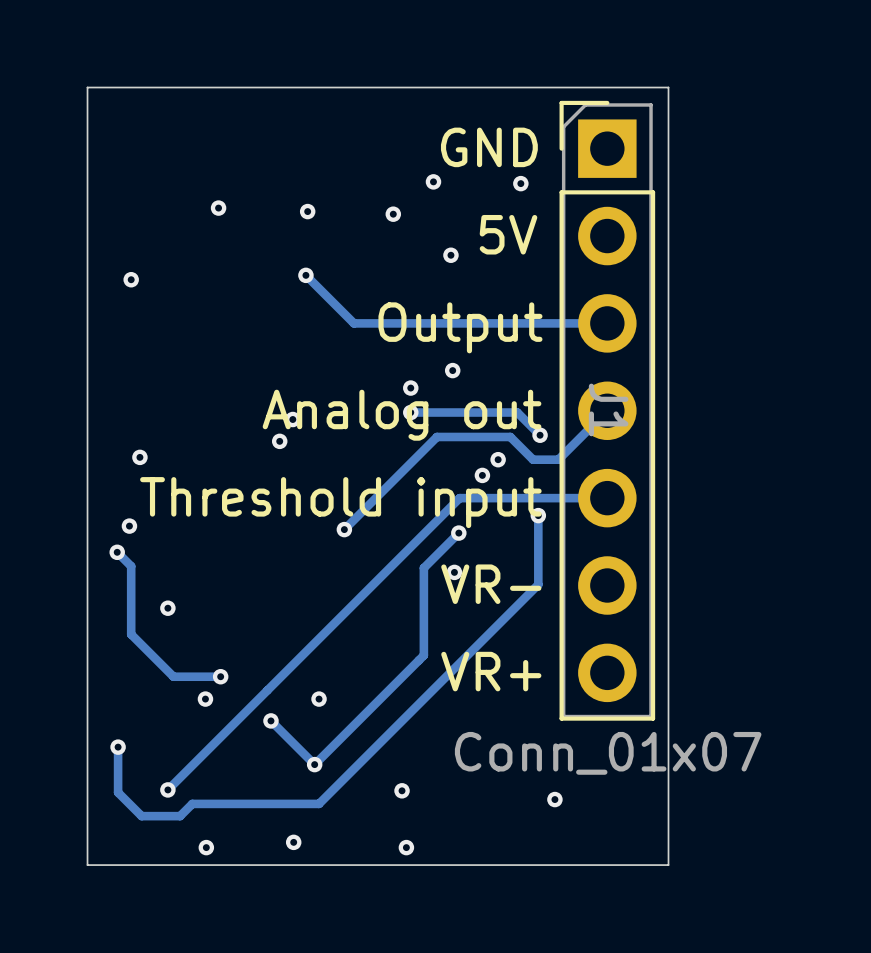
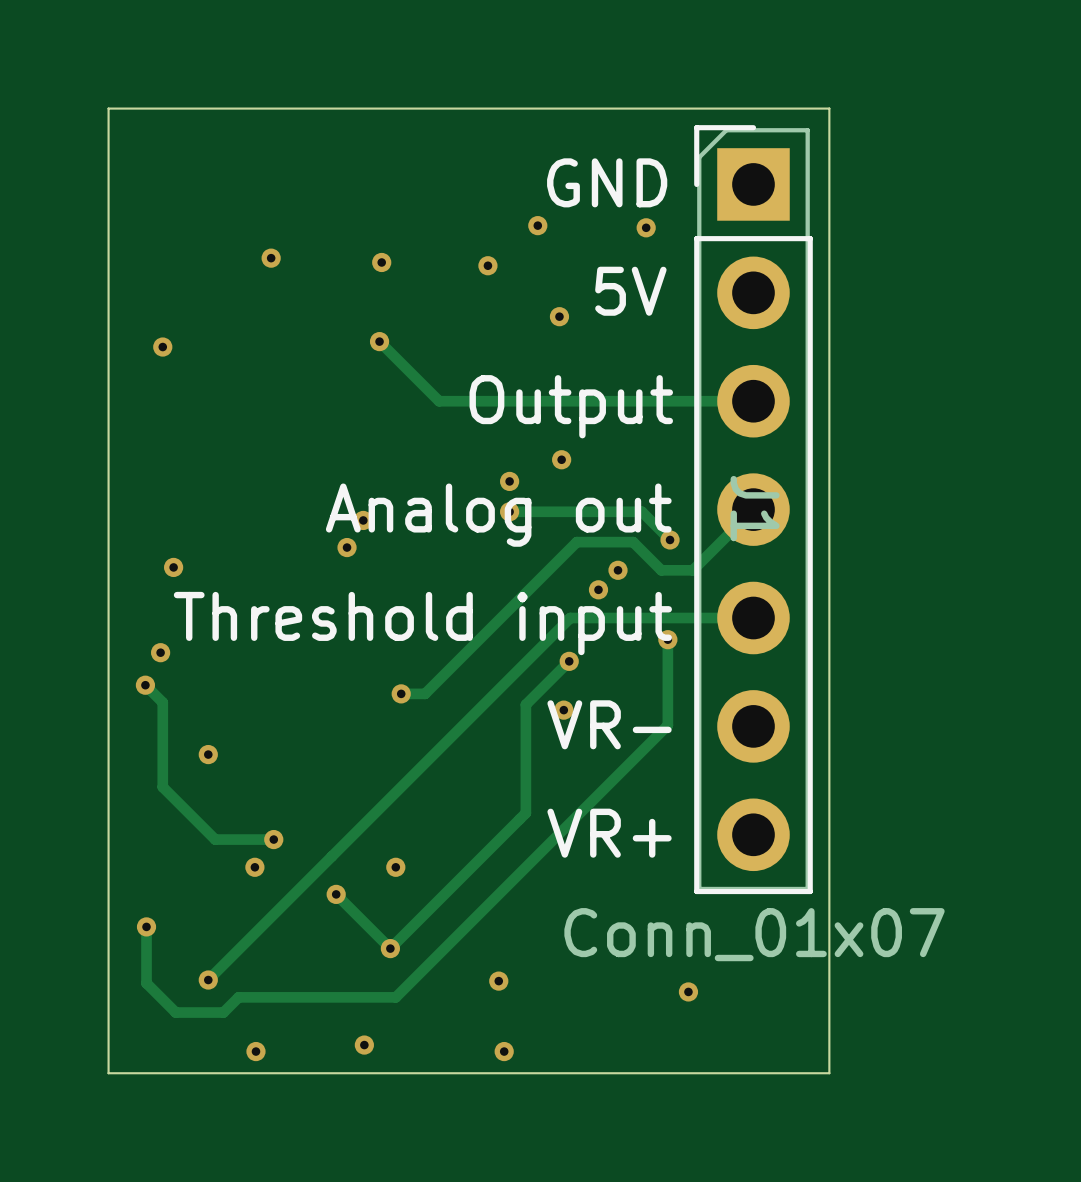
track: (464, 436) (436, 436) (344, 529) -> (576, 542) (425, 693) (401, 693)
via position: (344, 529) -> (401, 693)

